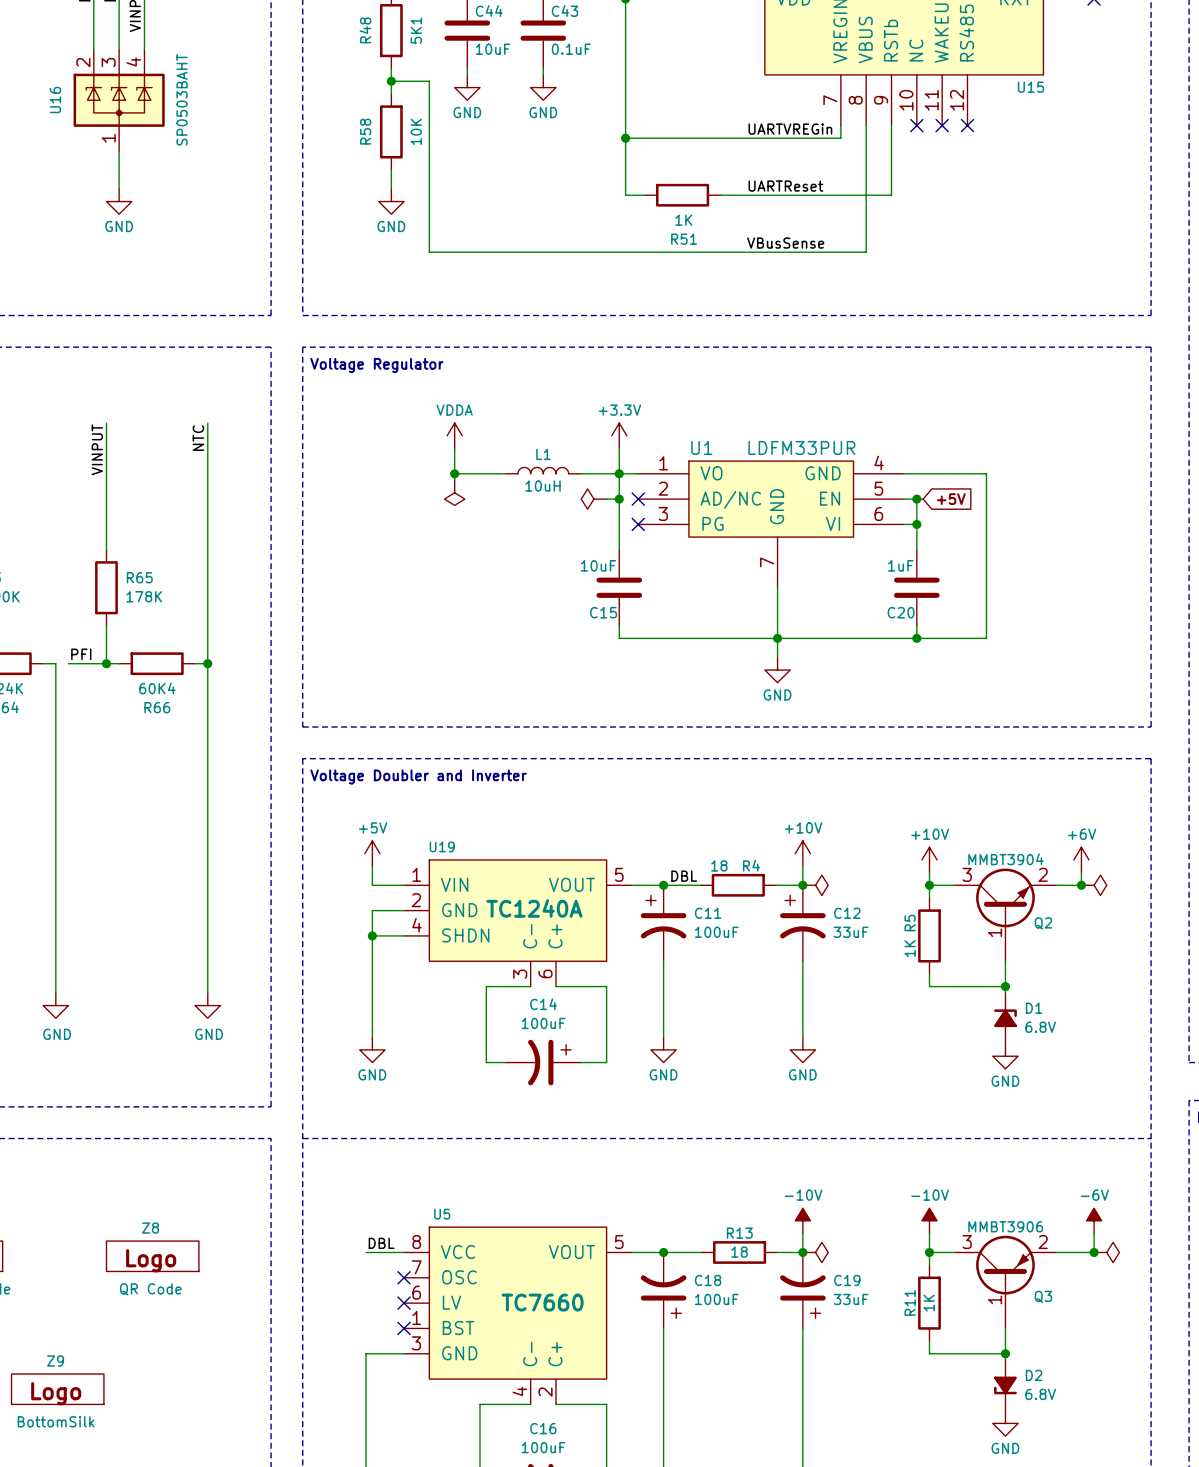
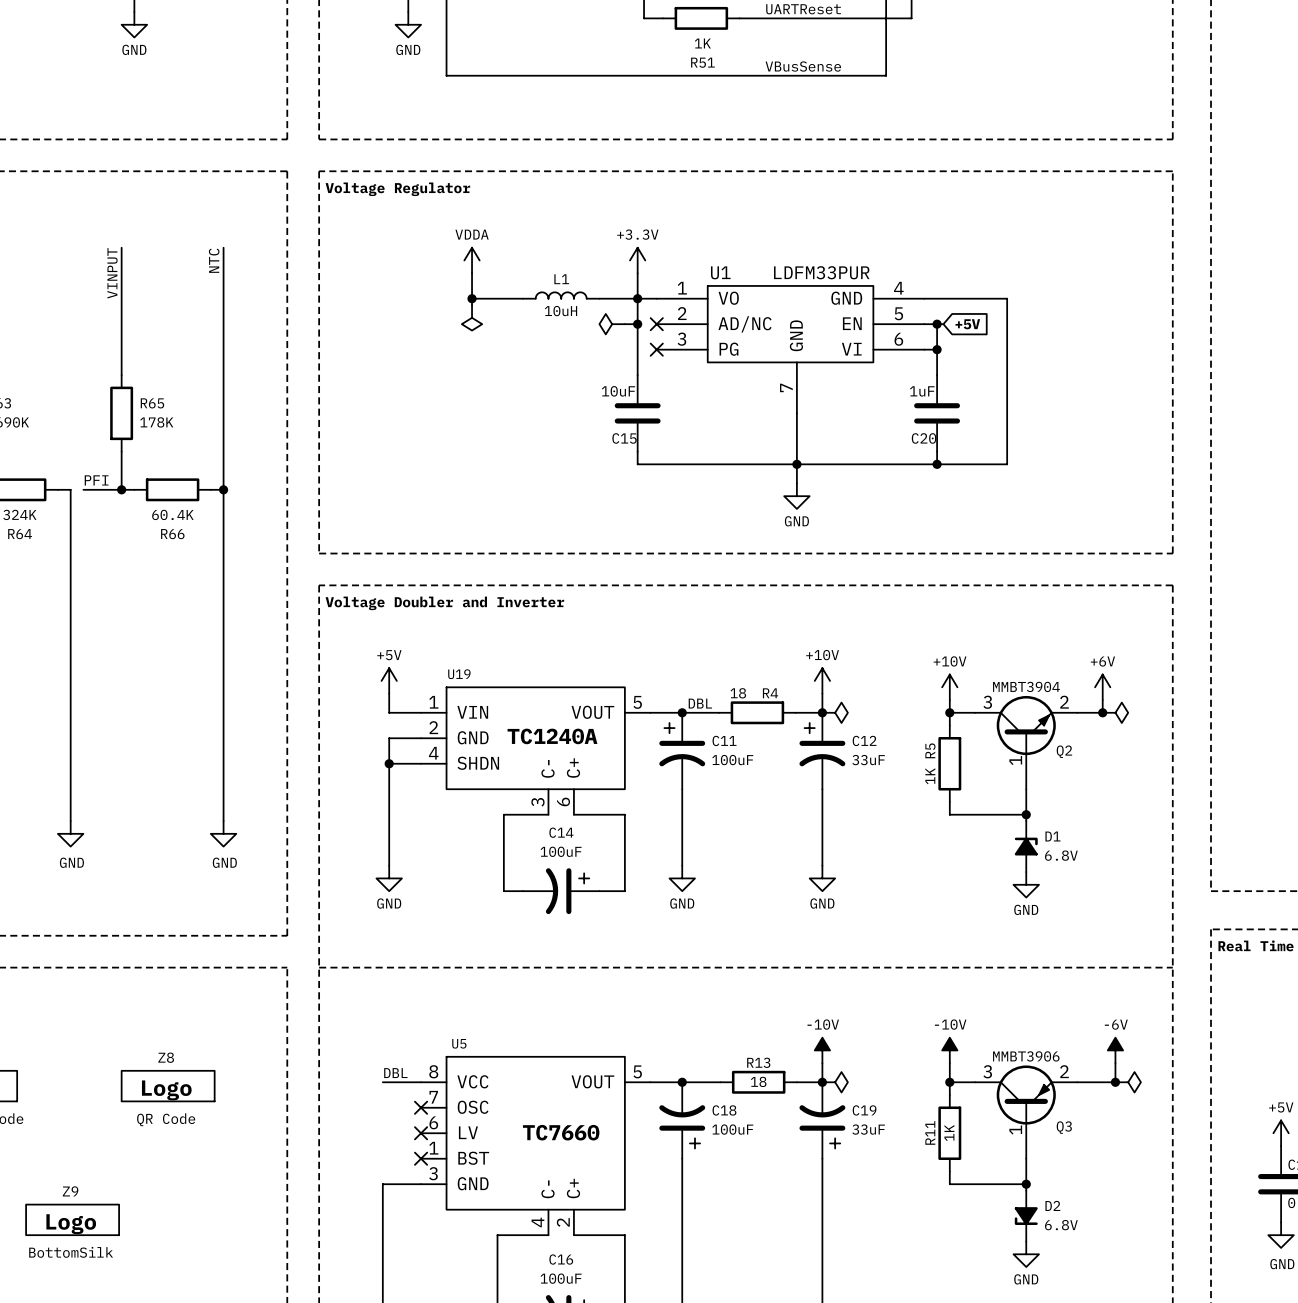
R66 value: 60K4 (157, 688) -> 60.4K (172, 514)

